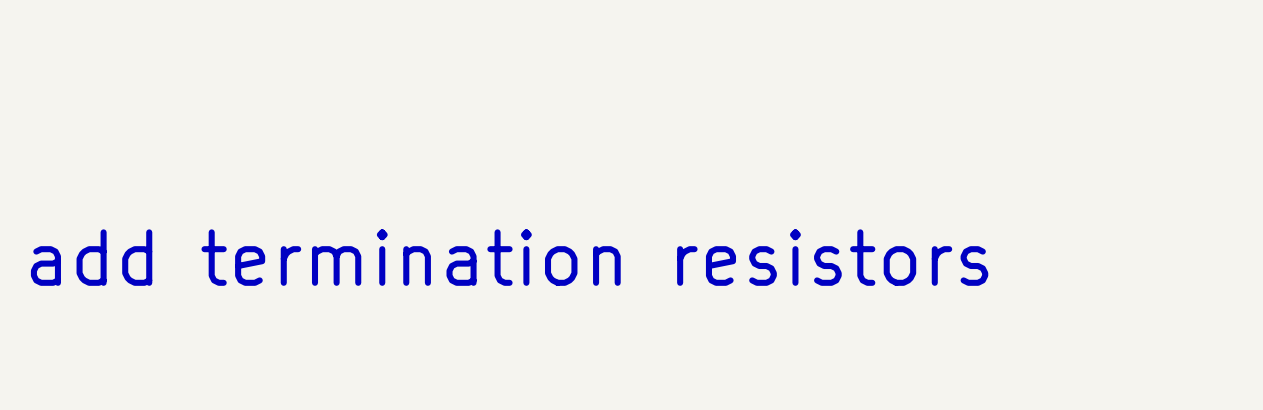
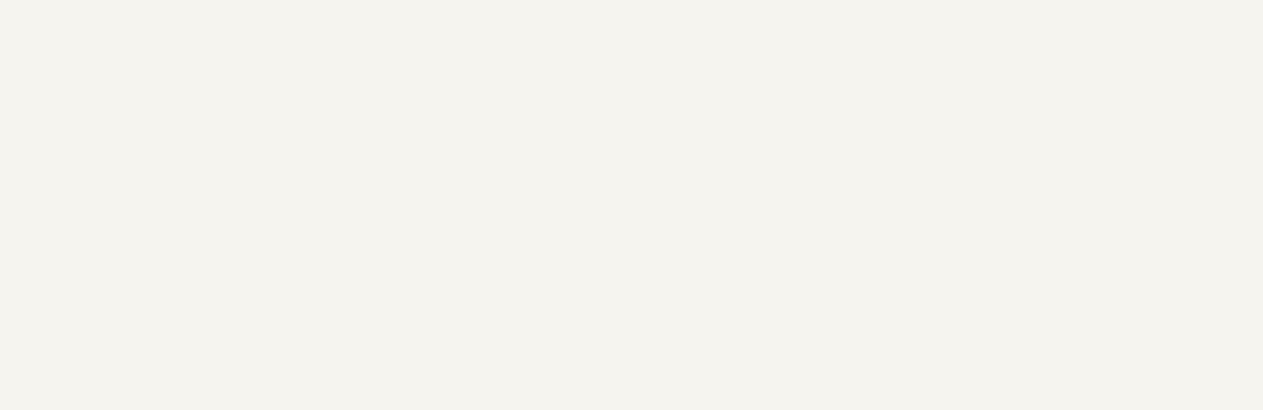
text: add termination resistors (509, 257) -> none

